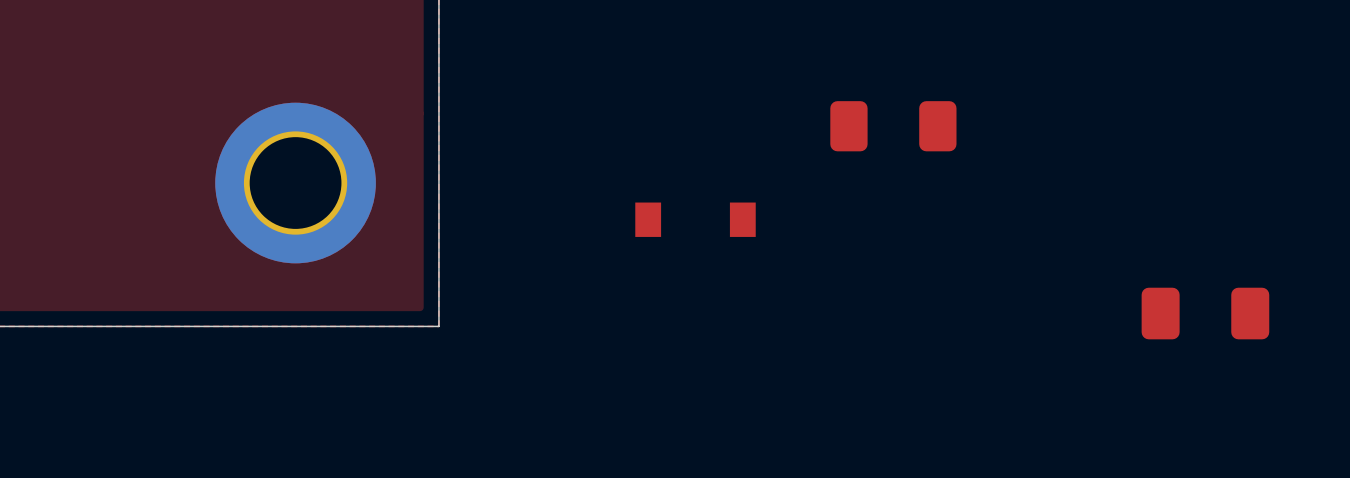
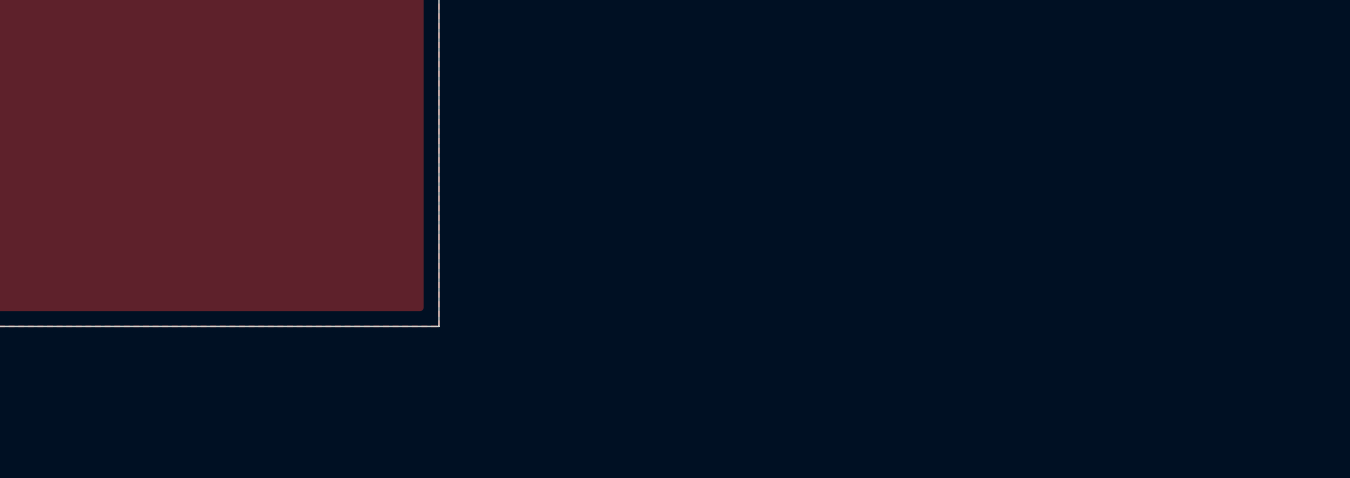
part: (893, 126) -> none
part: (295, 183) -> none
part: (695, 219) -> none
part: (1205, 313) -> none

